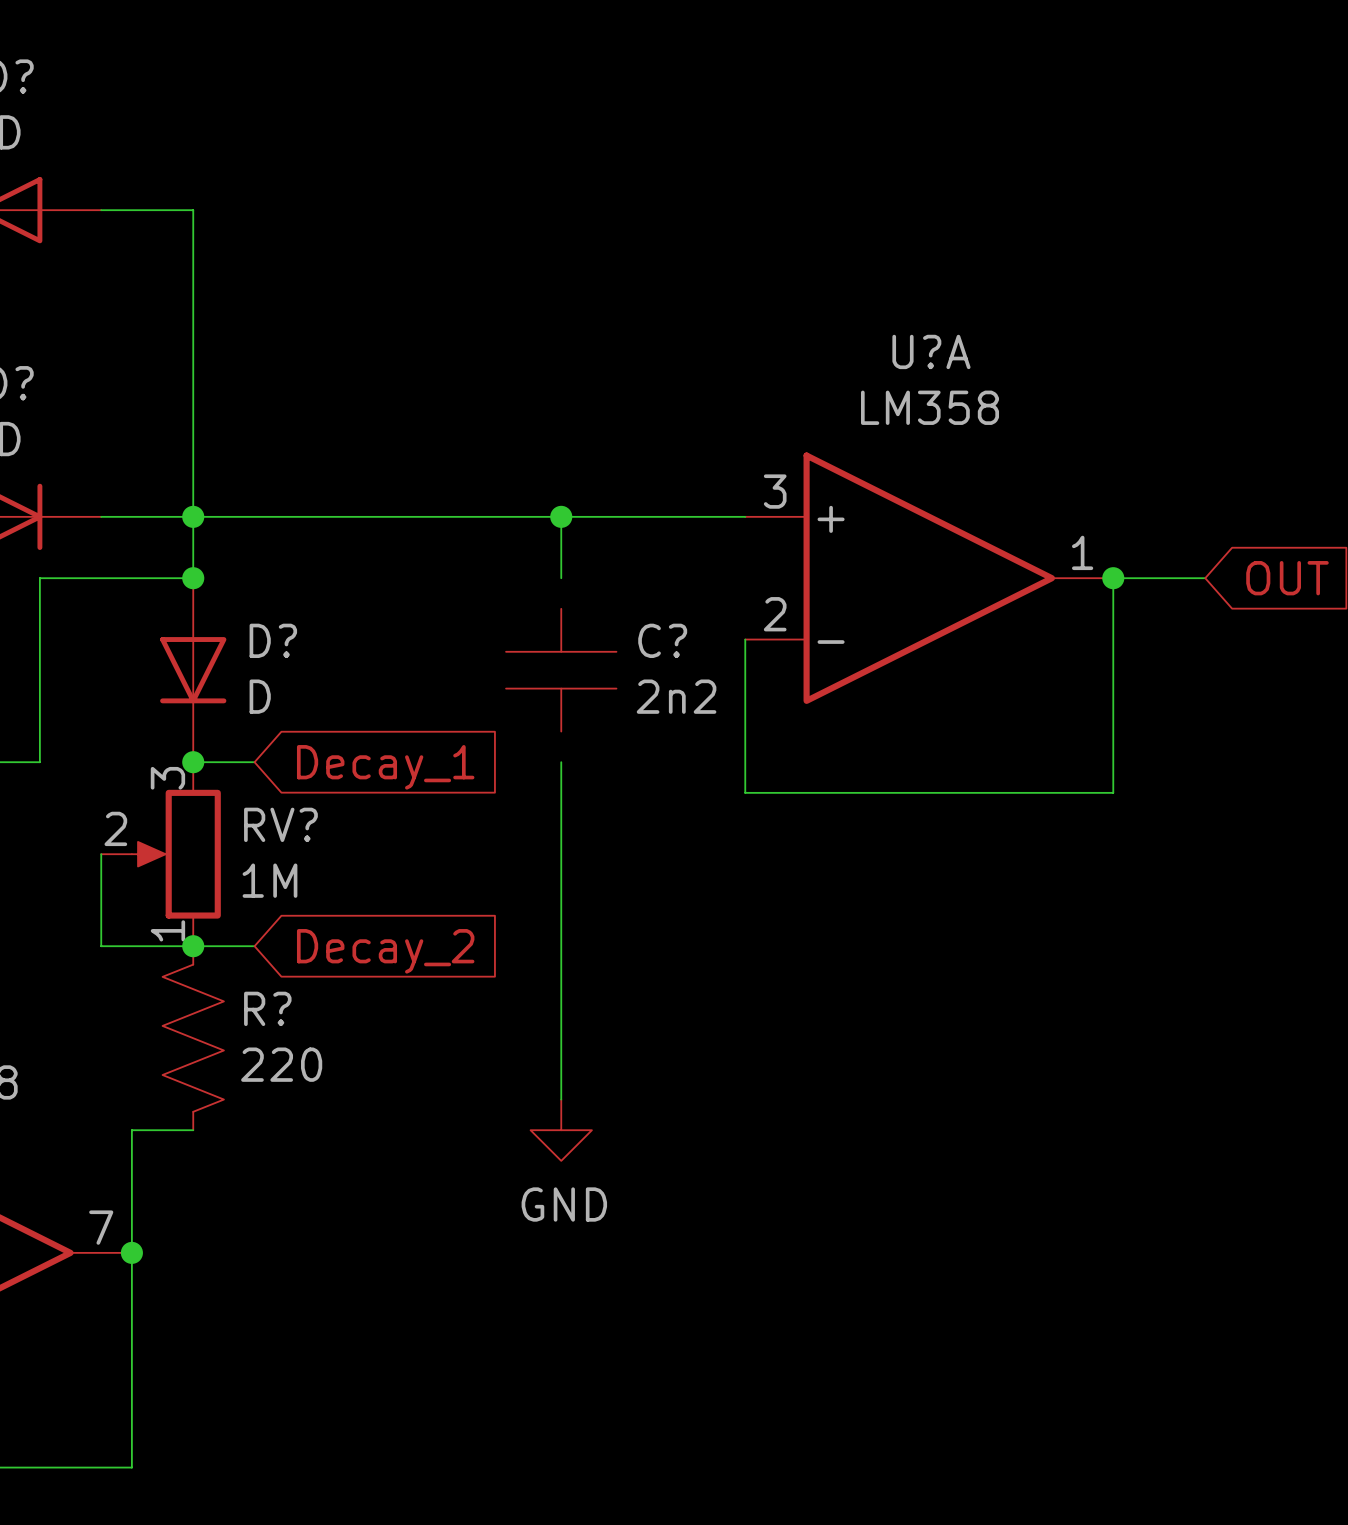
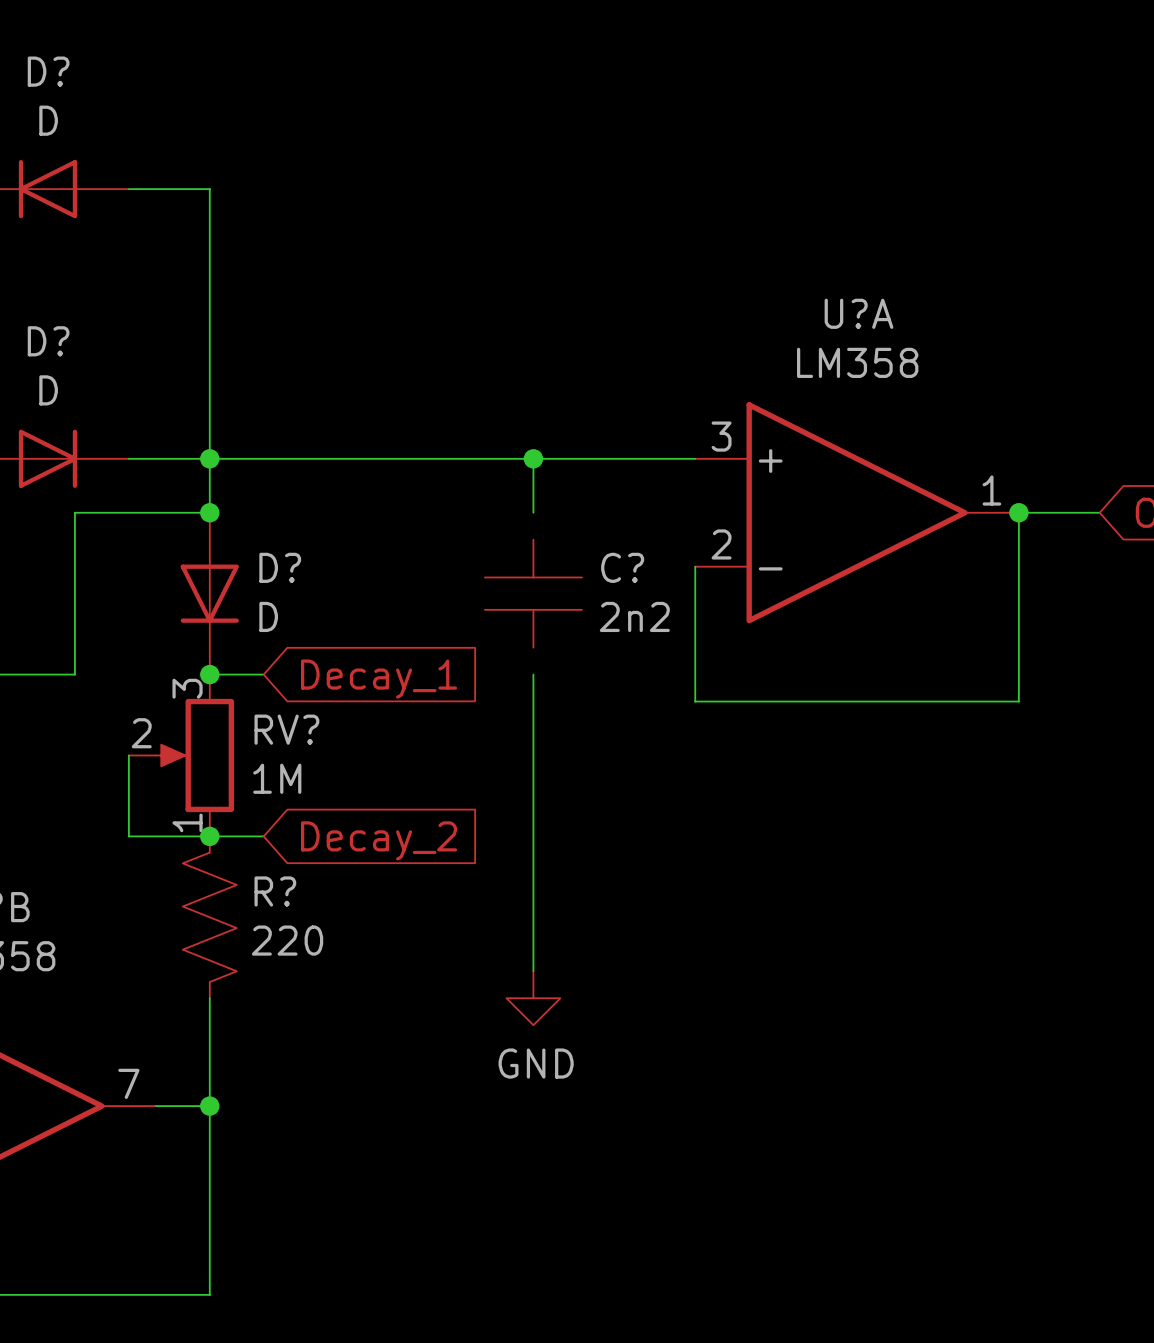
wire: (193, 1130) (131, 1130) (131, 1467) -> (209, 998) (209, 1294) (155, 1294)
wire: none -> (155, 1106) (209, 1106)
junction position: (131, 1252) -> (209, 1106)

